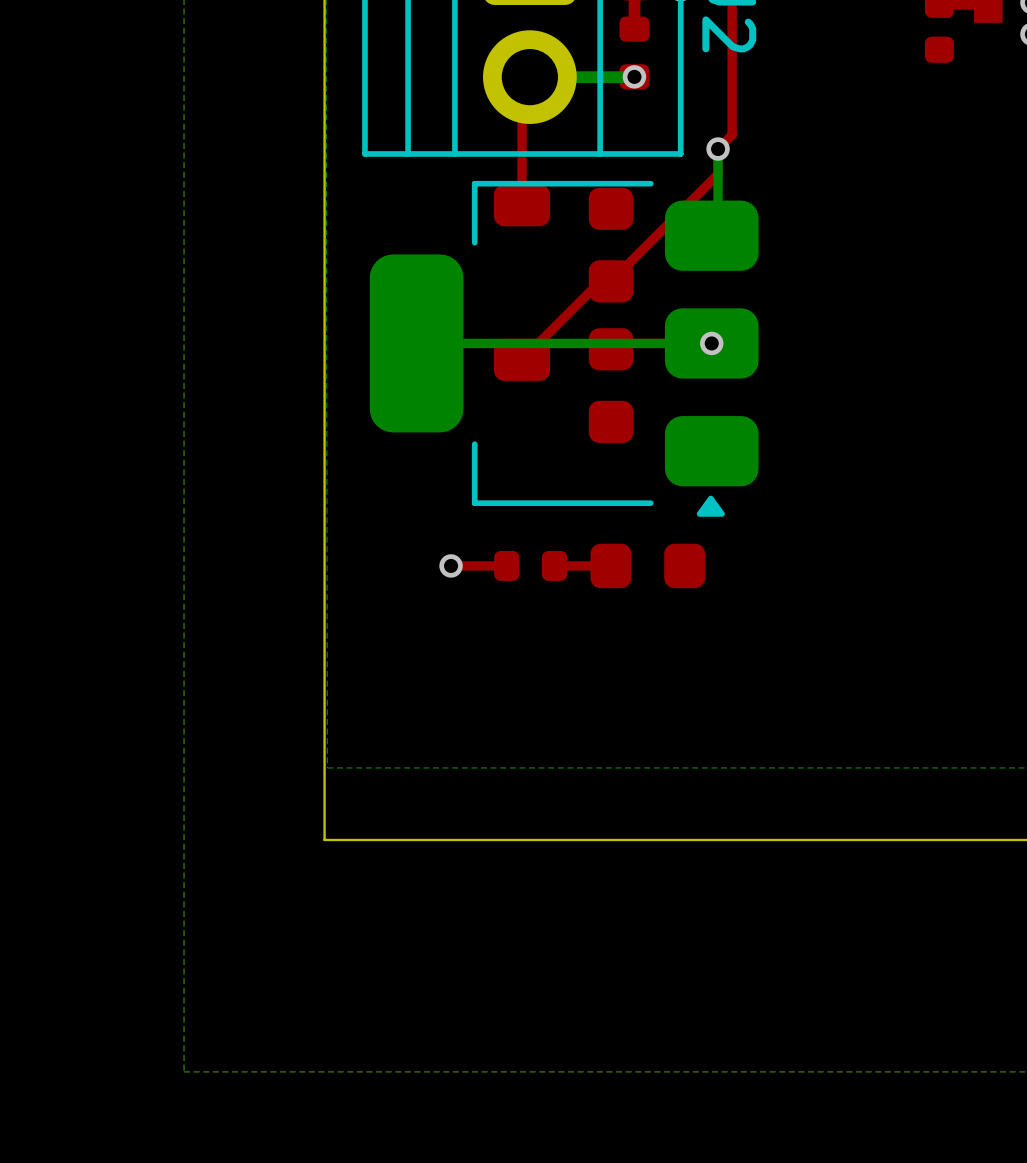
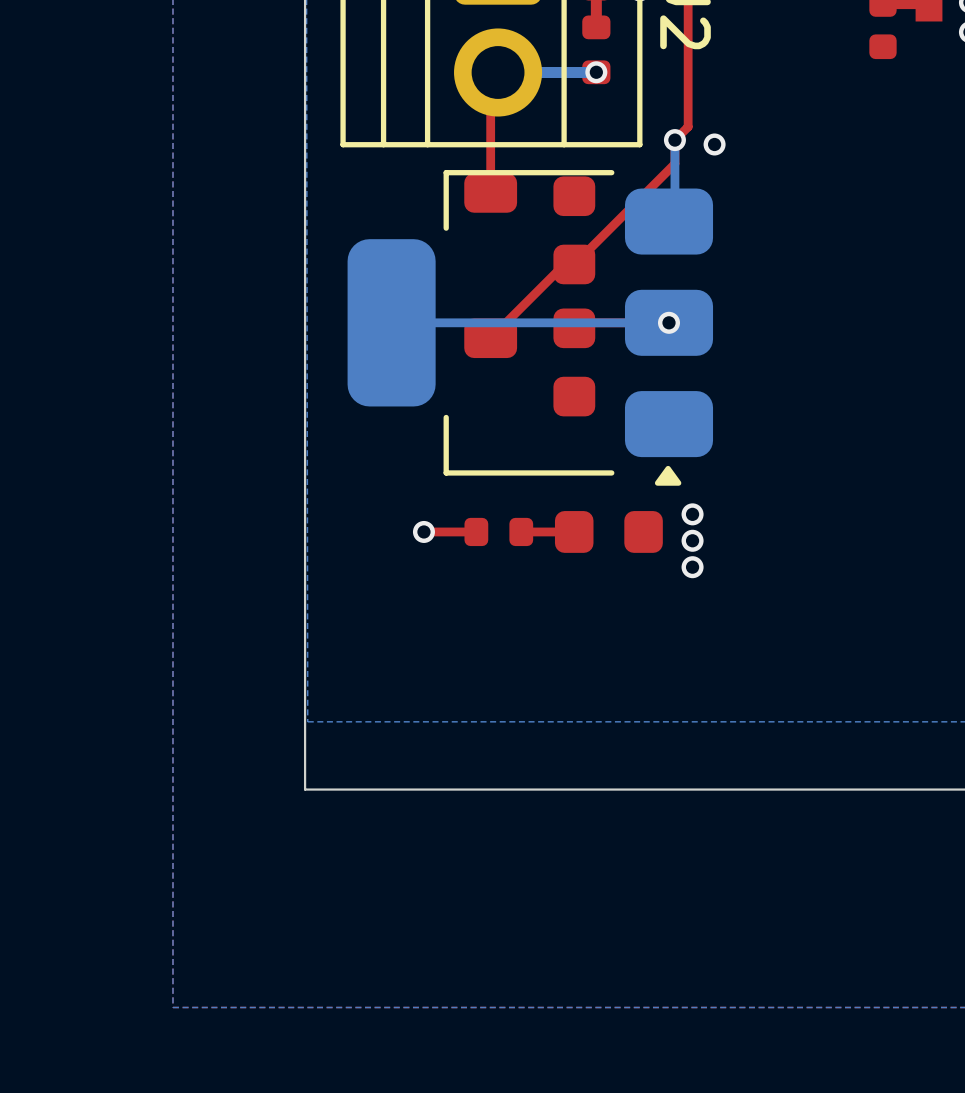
via: none -> (714, 144)
via: none -> (692, 514)
via: none -> (692, 540)
via: none -> (692, 567)

